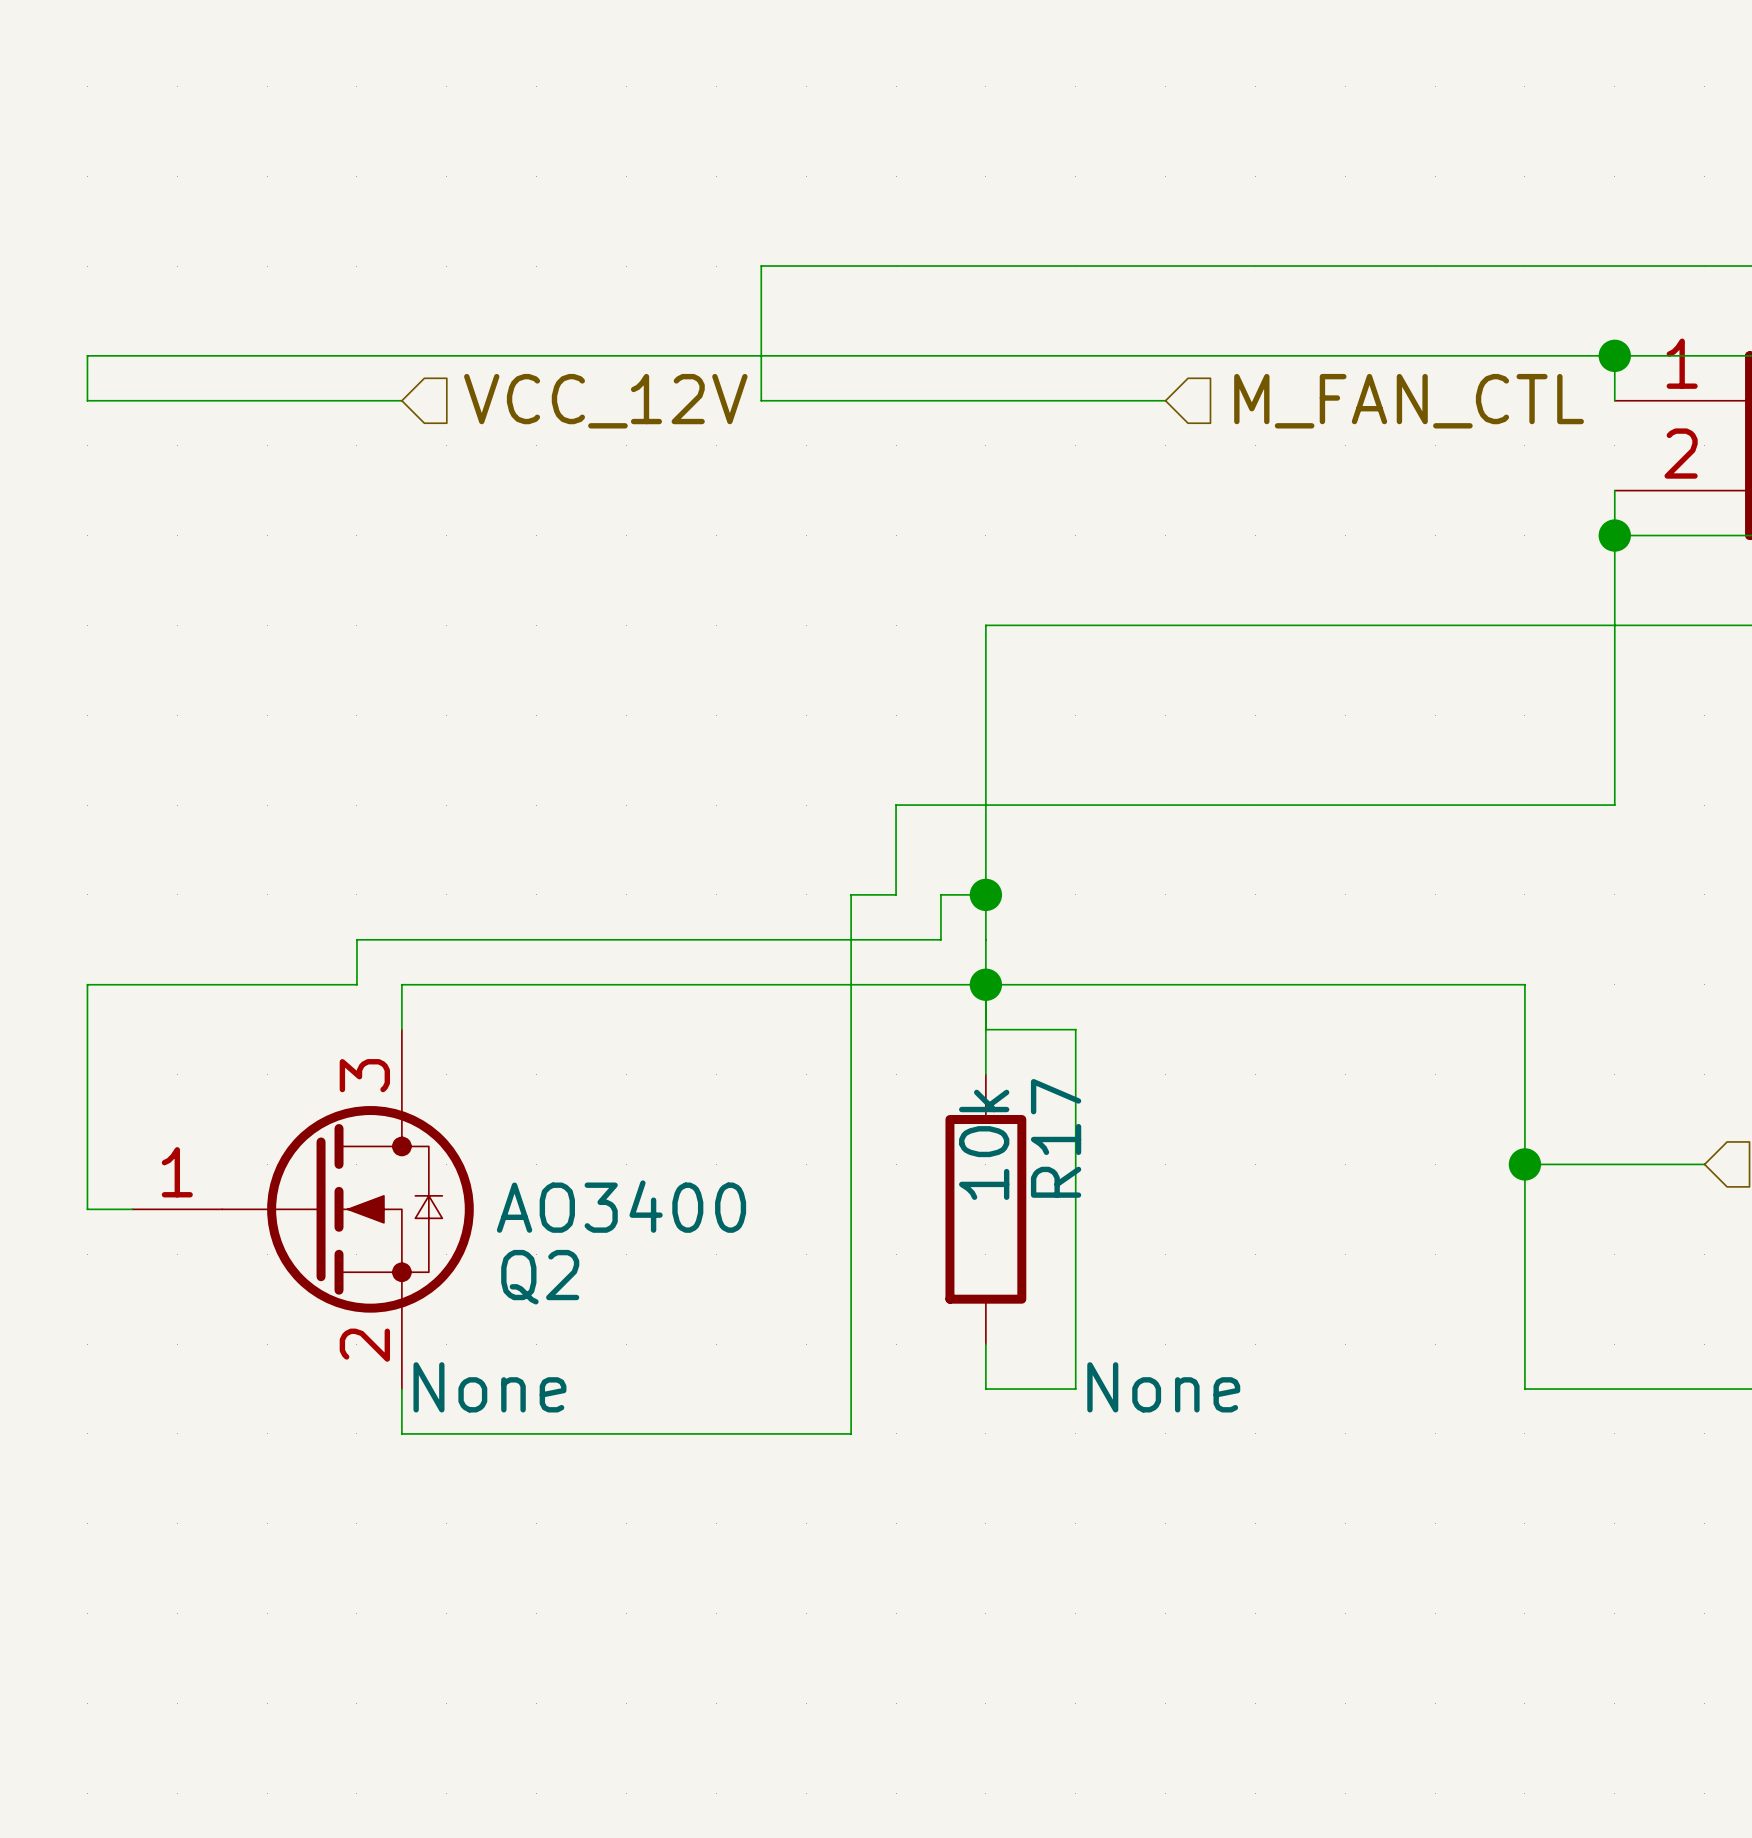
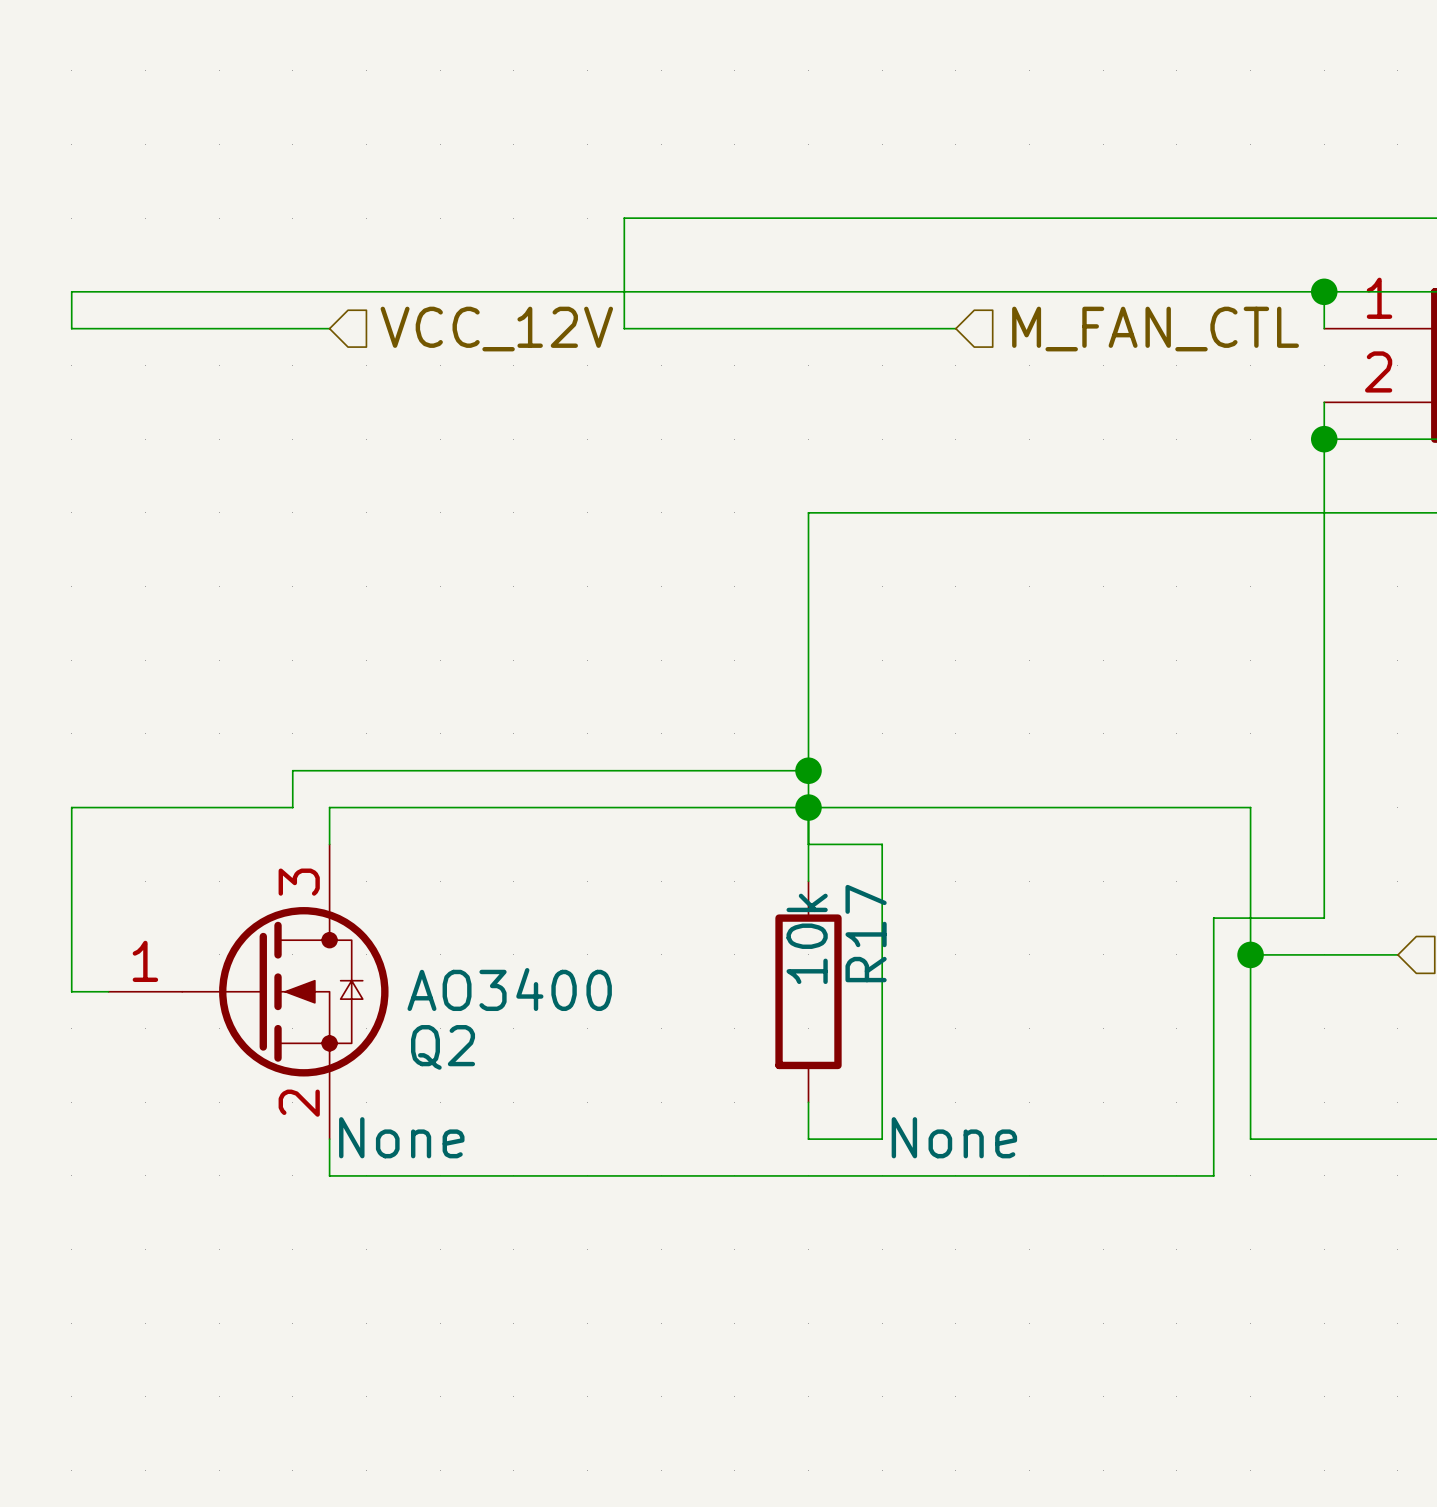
wire: (1614, 805) (896, 805) (896, 894) (851, 894) (851, 1433) -> (1324, 660) (1324, 918) (1213, 918) (1213, 1175) (697, 1175)
wire: (985, 894) (940, 894) (940, 939) -> (808, 770) (771, 770)
junction position: (985, 894) -> (808, 770)

